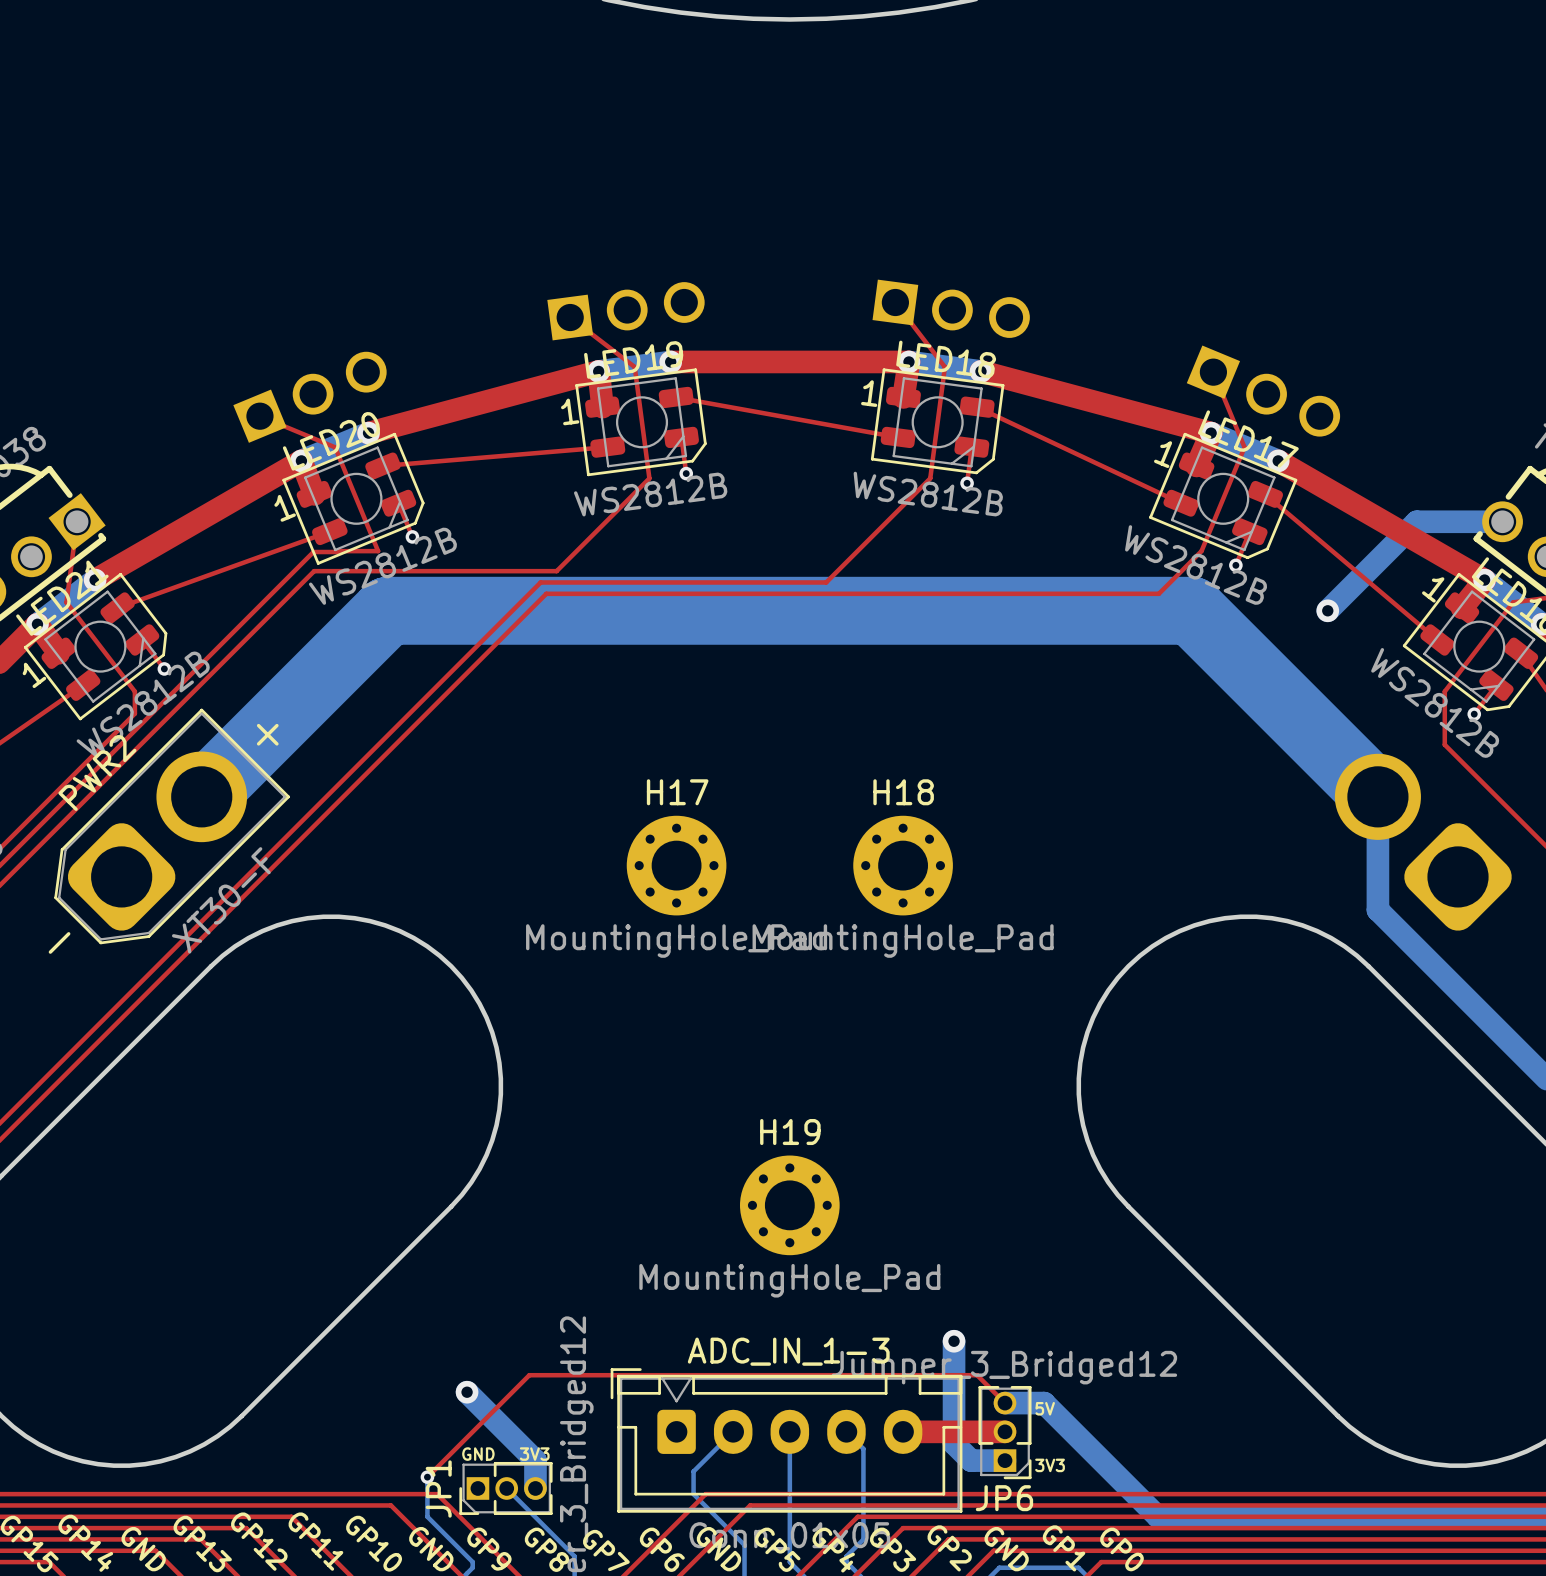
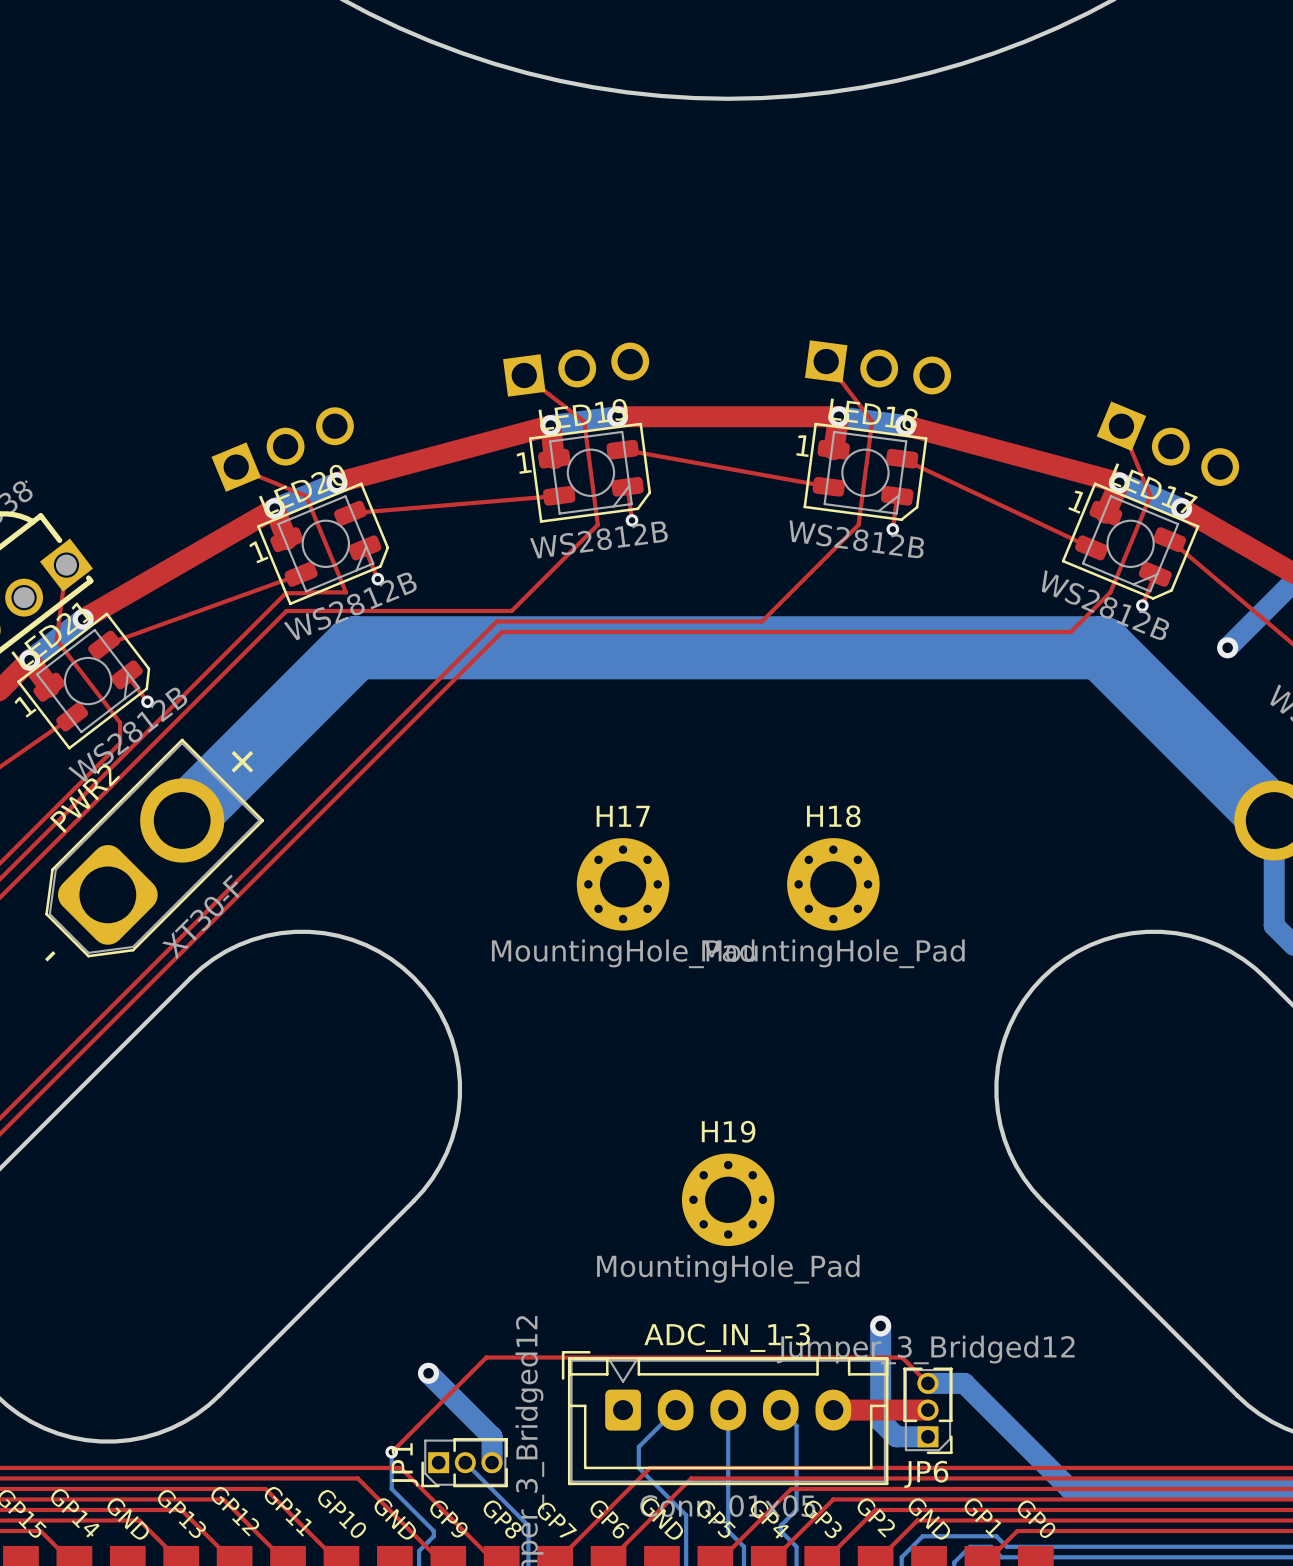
text: 5V (1045, 1408) -> none
text: GND (478, 1454) -> none
text: 3V3 (534, 1454) -> none
text: 3V3 (1050, 1465) -> none

